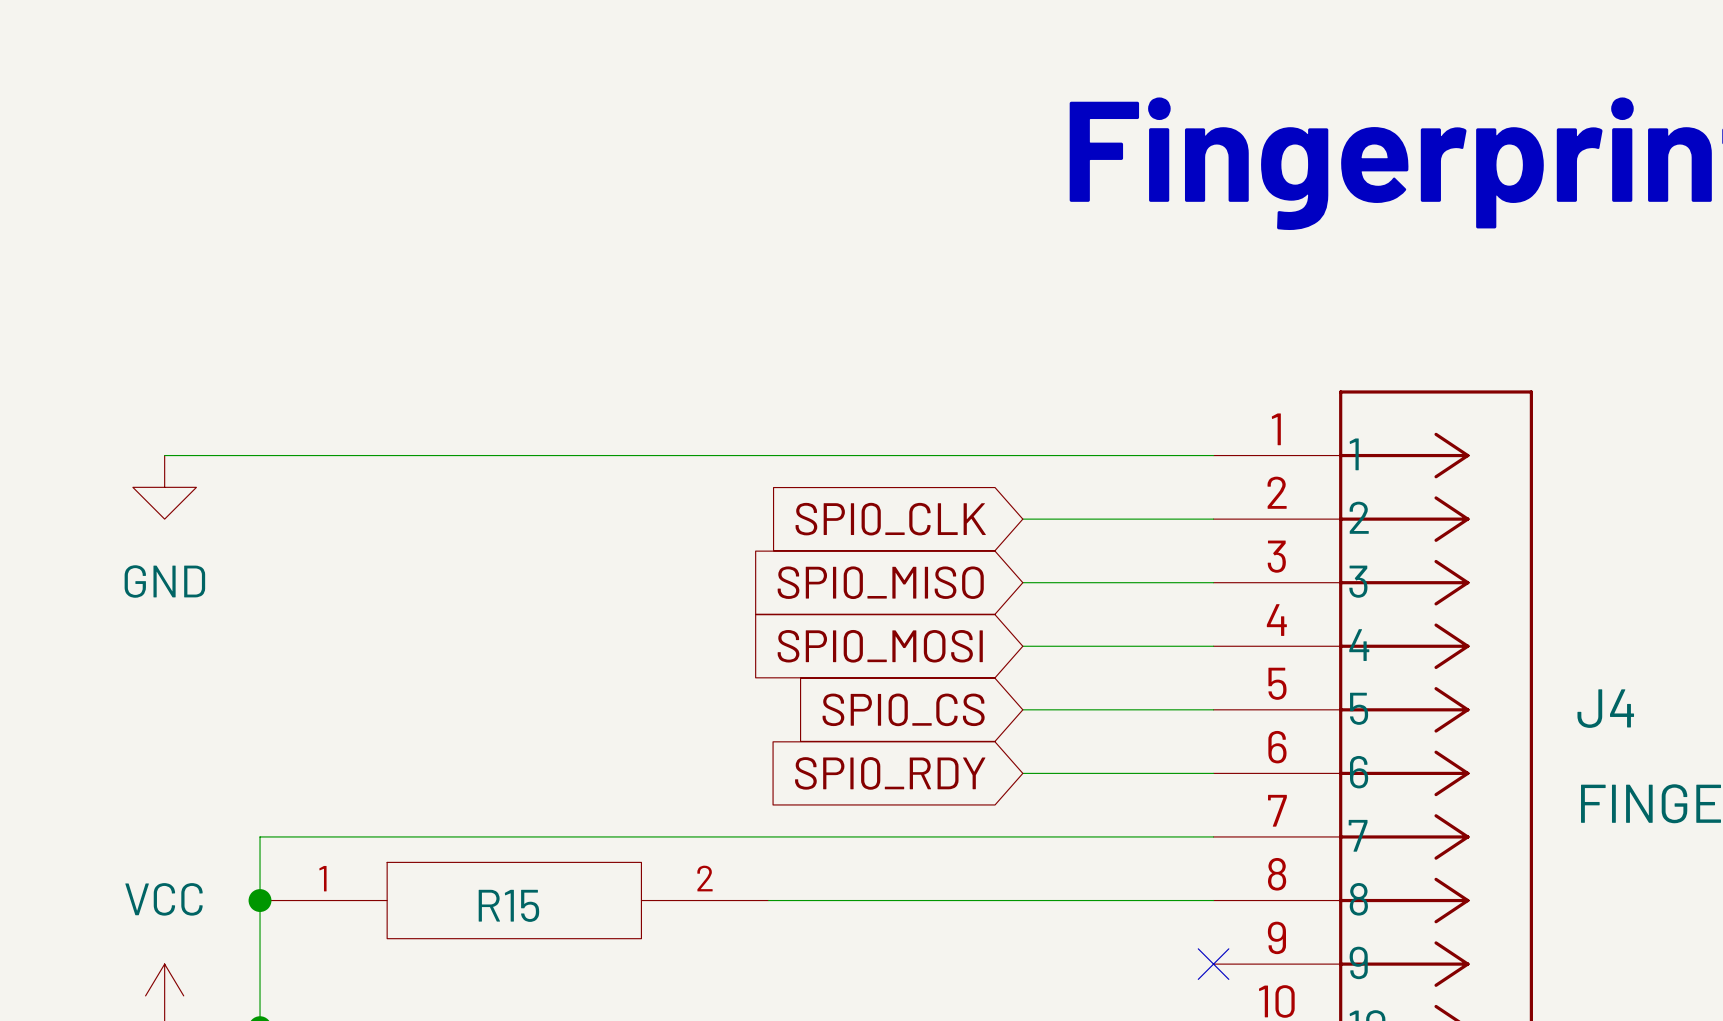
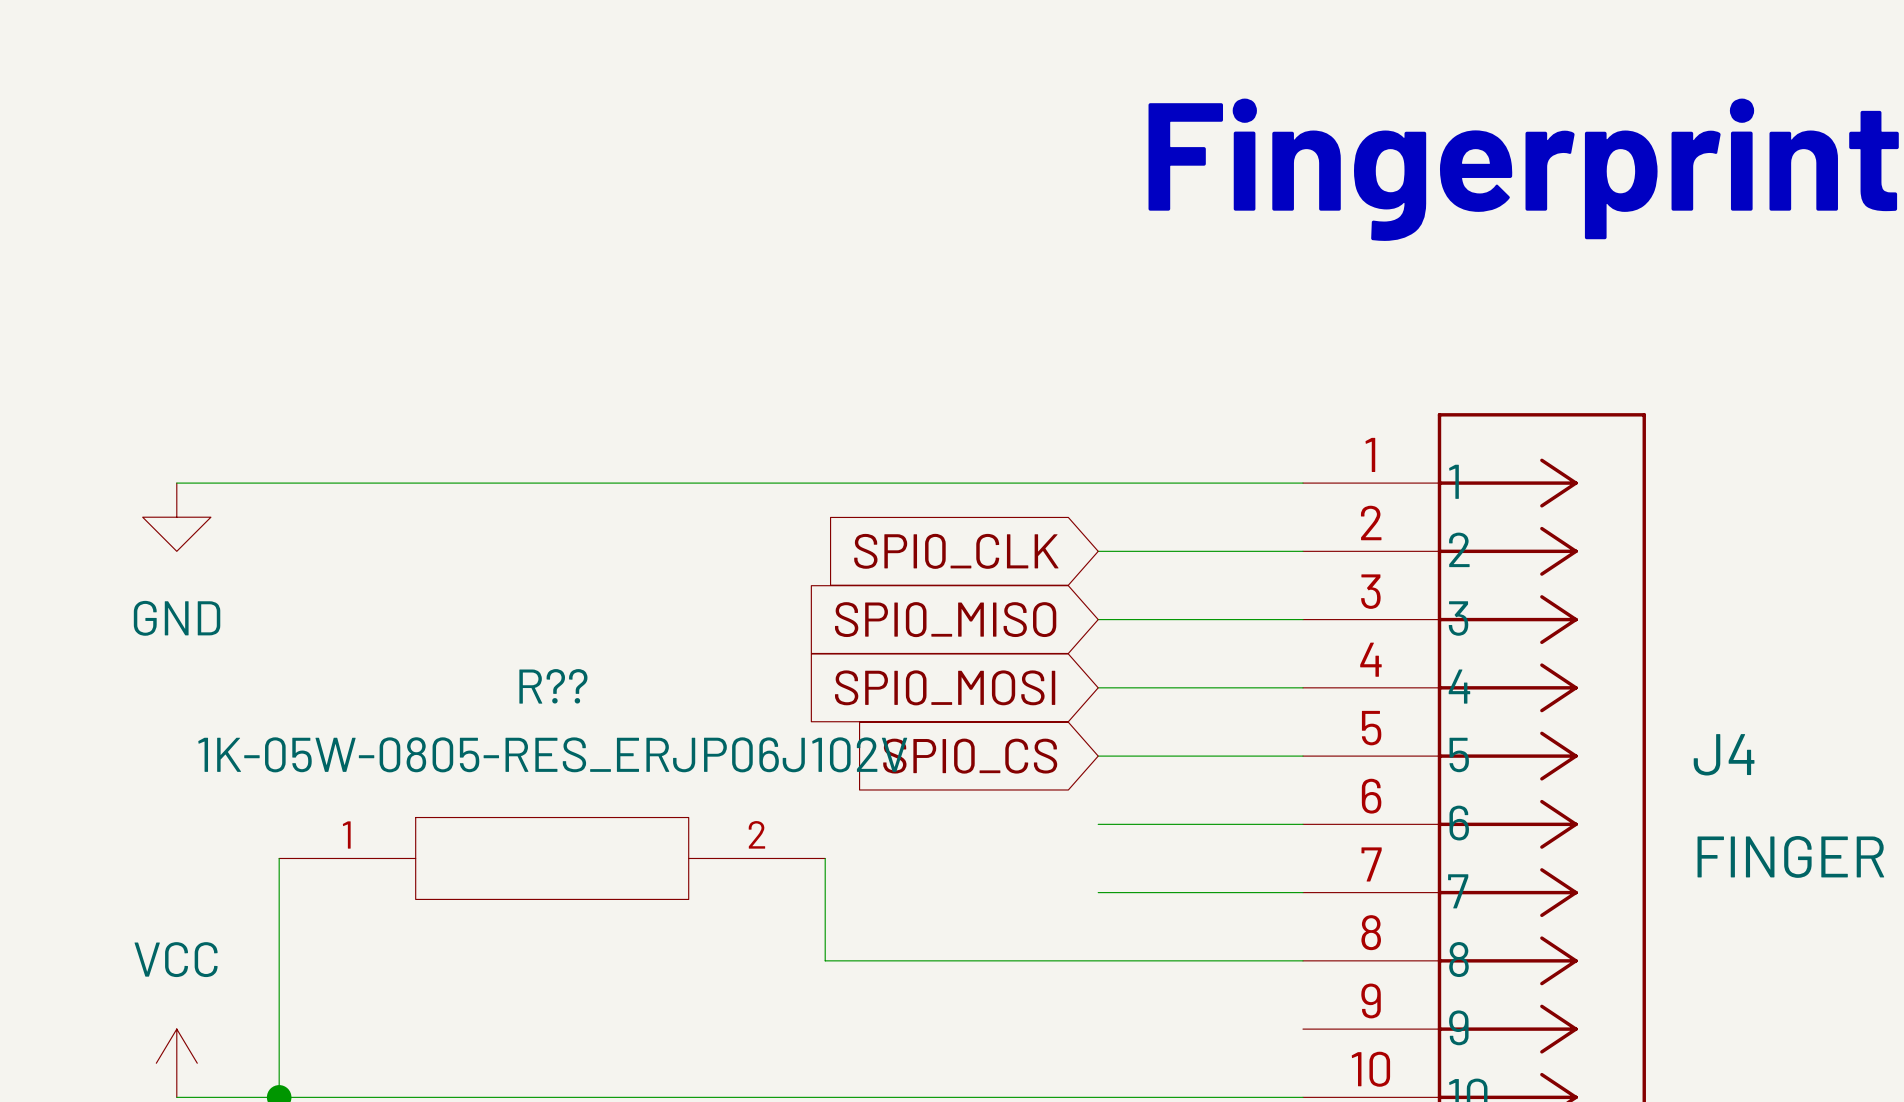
global label: SPI0_RDY (890, 773) -> none
R??: none -> 1K-05W-0805-RES_ERJP06J102V (552, 858)
wire: none -> (825, 858) (825, 960)
wire: (260, 836) (1022, 836) -> (279, 892) (279, 858)
junction: (260, 900) -> none
R15: (514, 900) -> none
no-connect mark: (1213, 964) -> none

